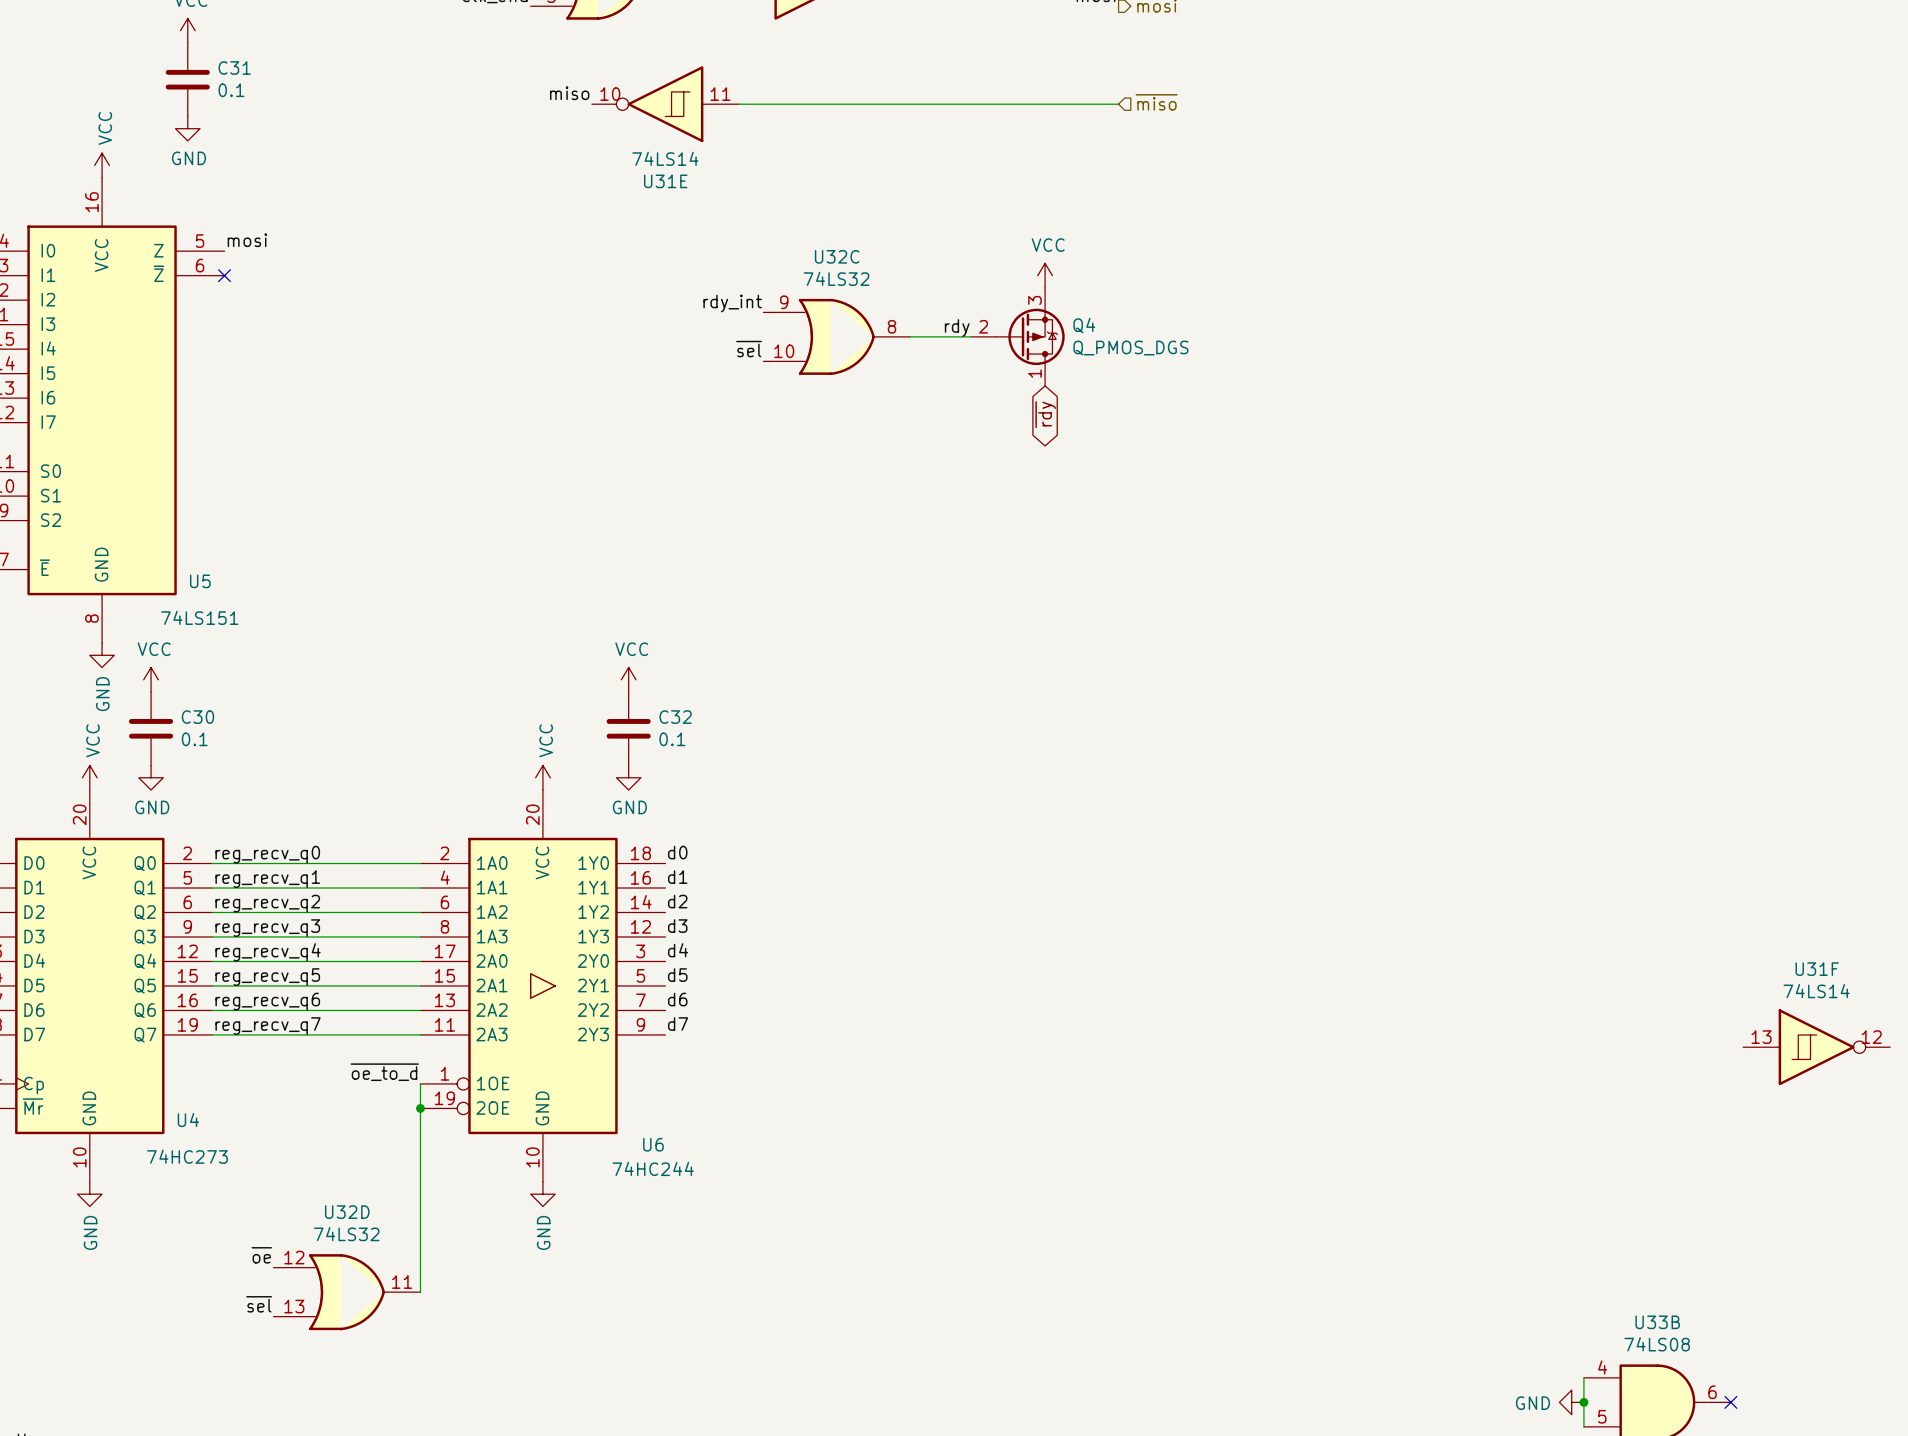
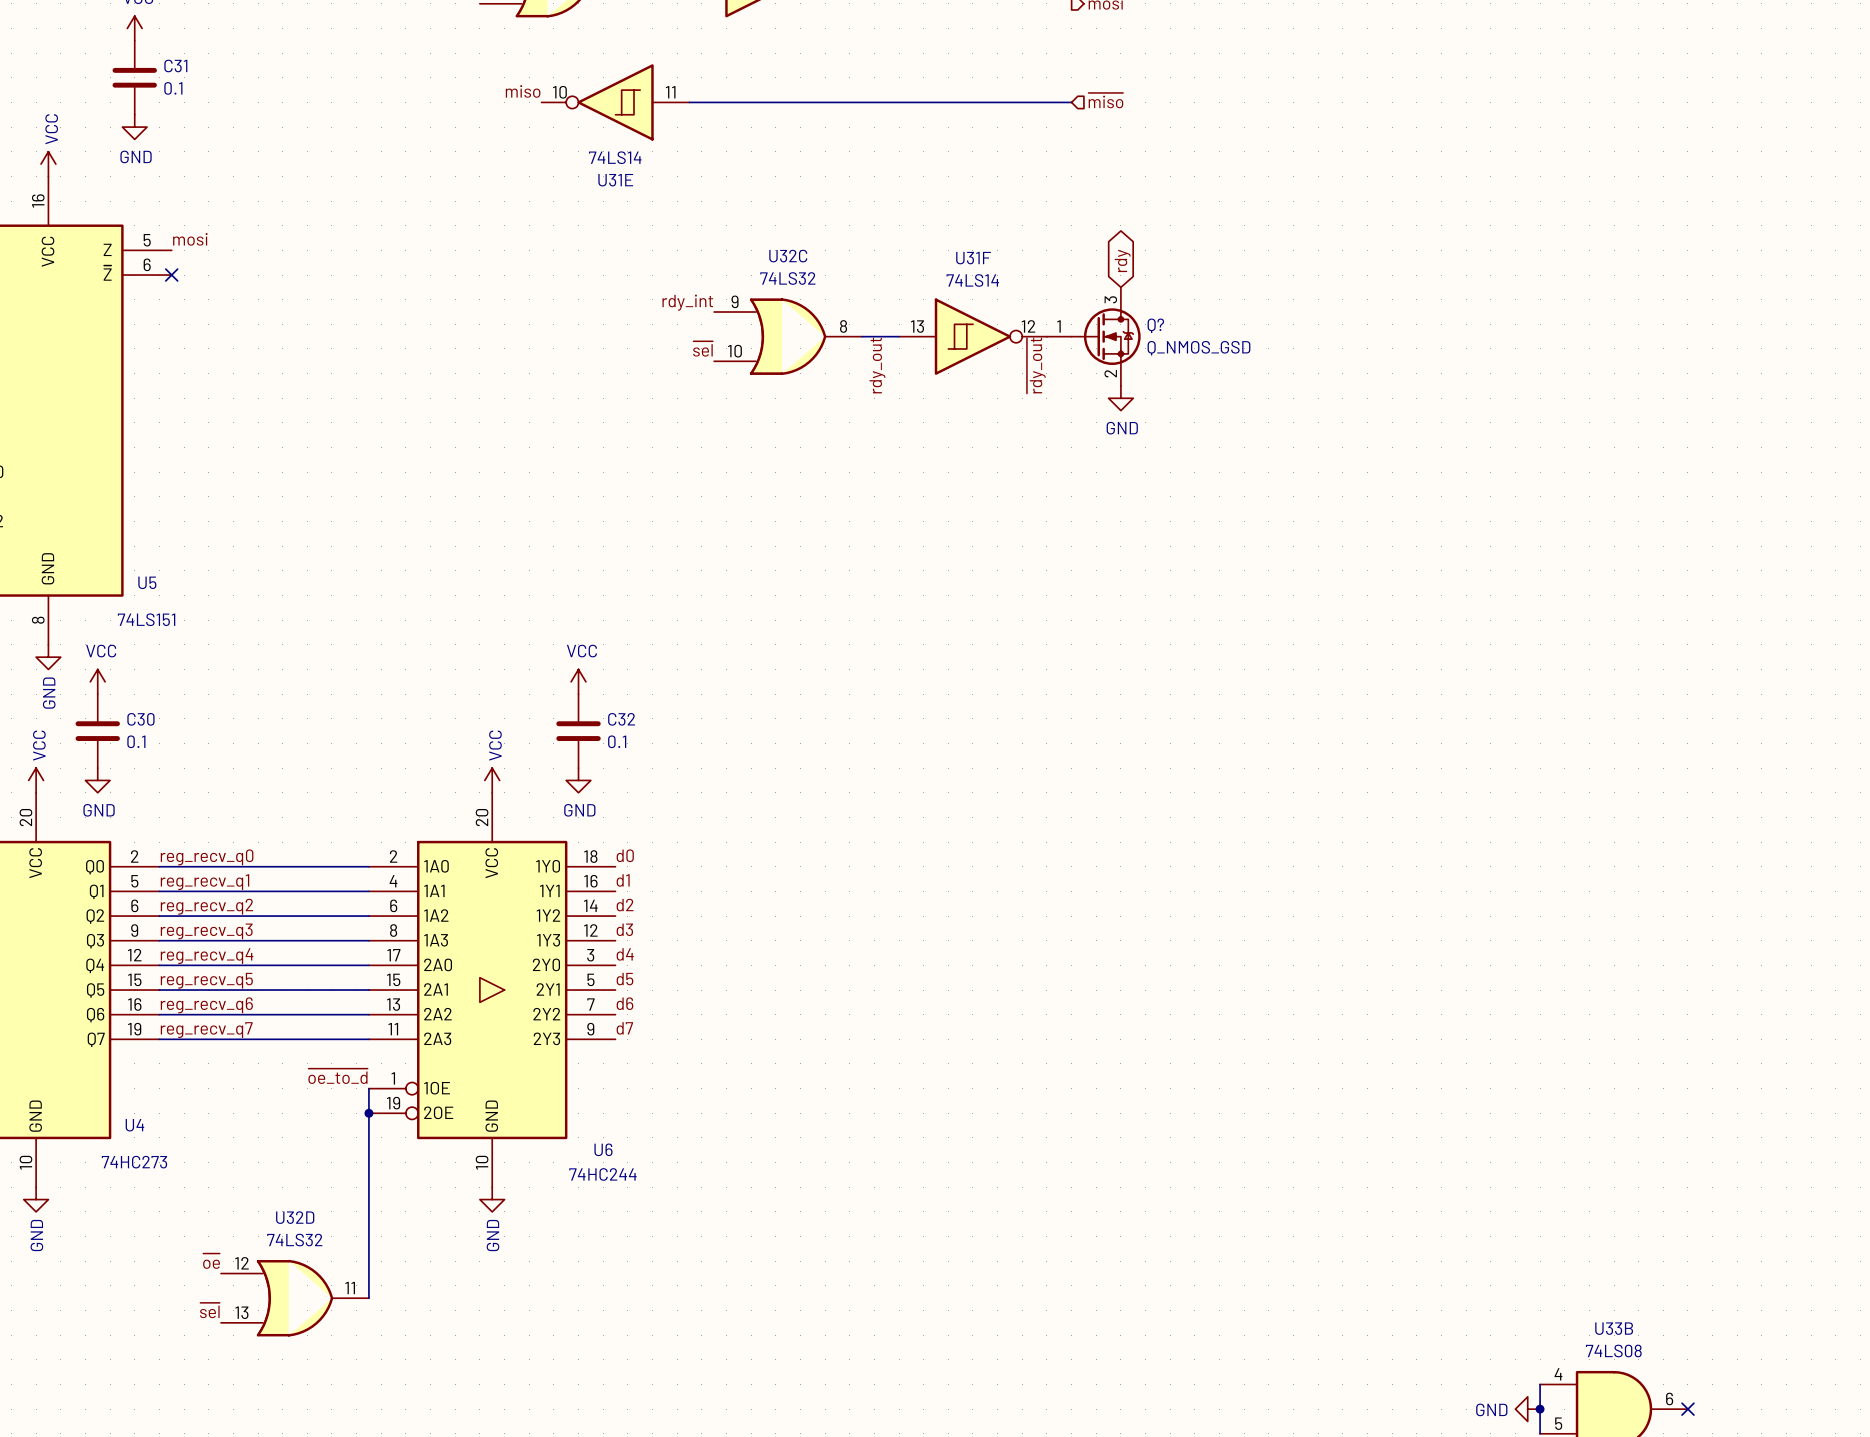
global label: none -> rdy (1122, 260)
power symbol: VCC (1045, 275) -> none
label: rdy (957, 328) -> none
Q4: Q_PMOS_DGS (1018, 336) -> none
Q?: none -> Q_NMOS_GSD (1093, 336)
label: none -> rdy_out (877, 365)
label: none -> ~{rdy_out} (1036, 365)
power symbol: none -> GND (1120, 398)
global label: ~{rdy} (1045, 414) -> none
U31F position: (1816, 1047) -> (972, 336)

